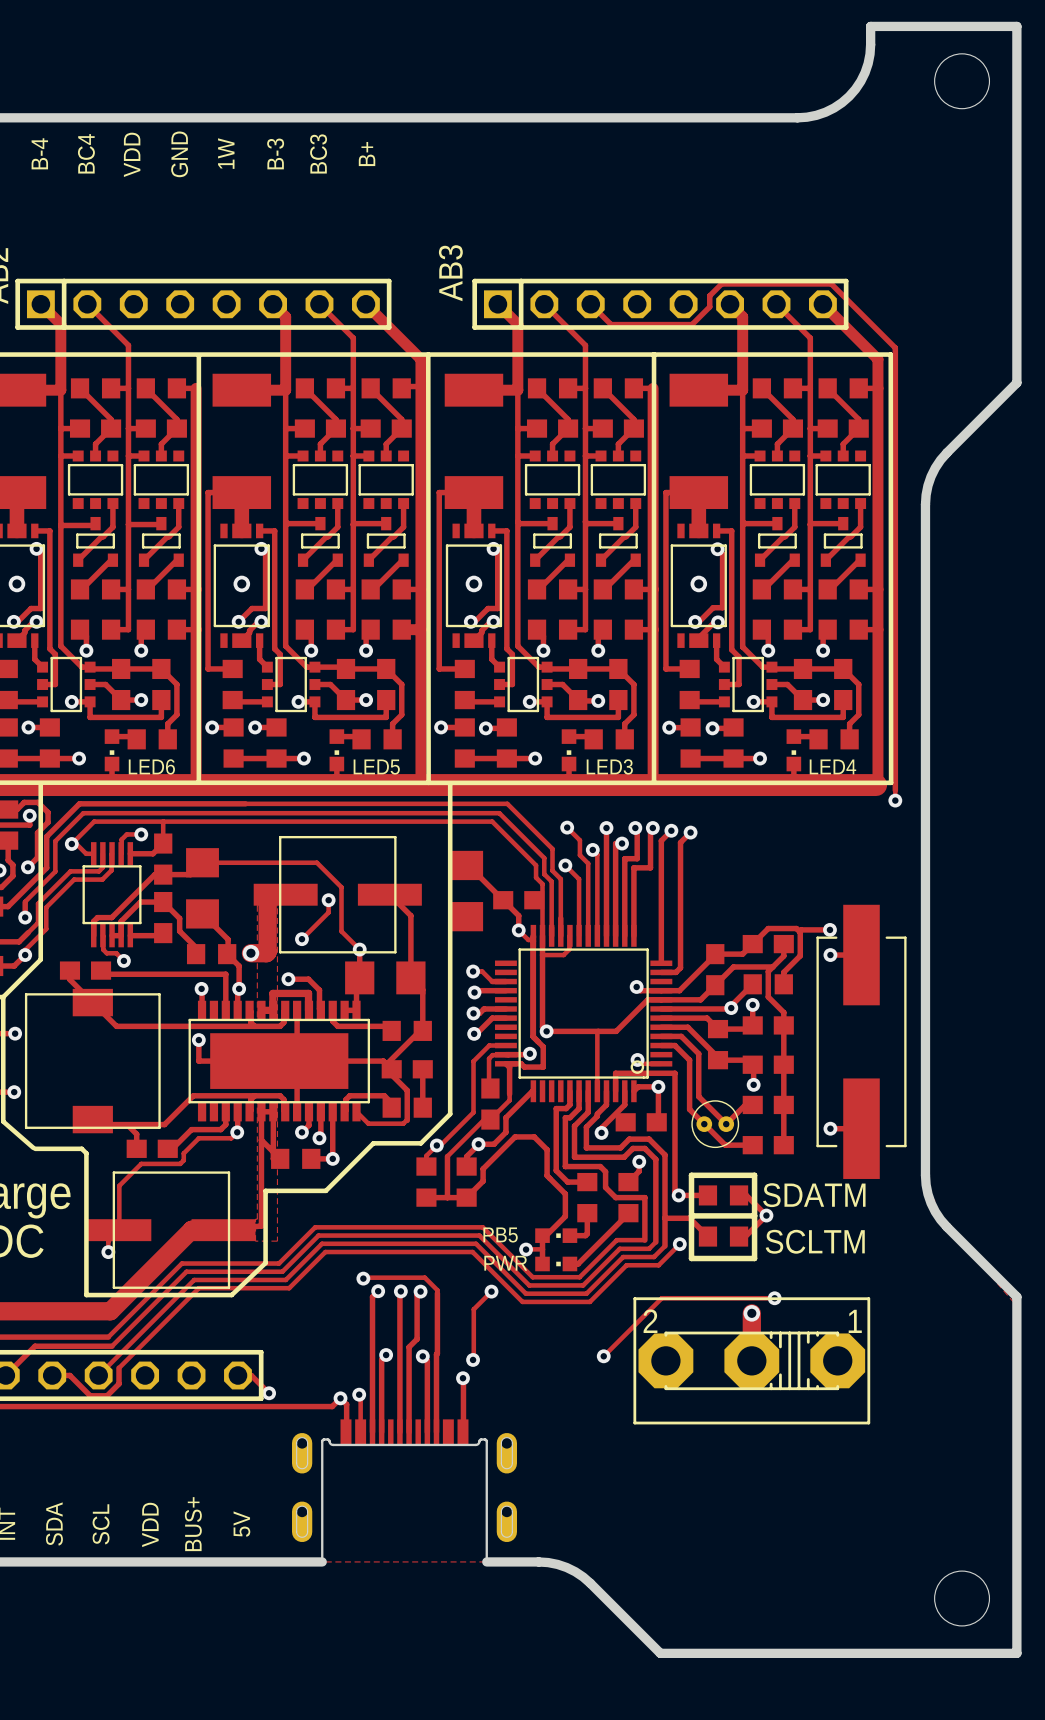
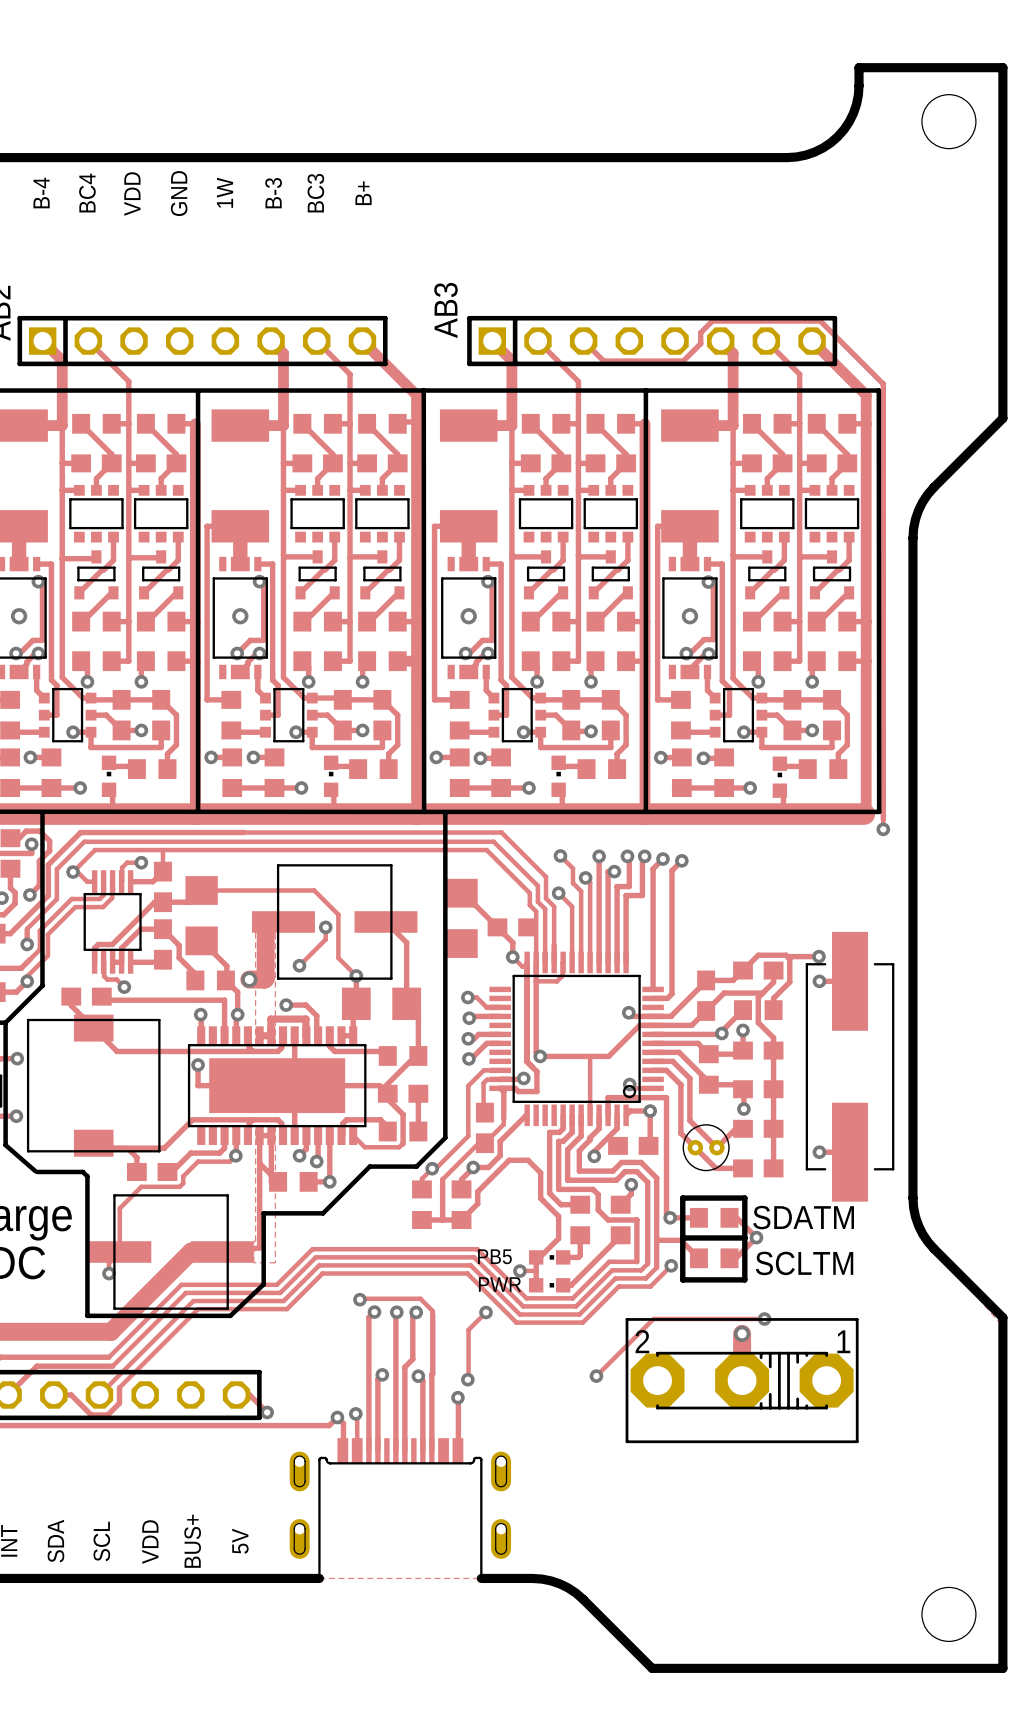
part: none -> (109, 776)
part: none -> (331, 776)
part: none -> (558, 776)
part: none -> (779, 777)
LED6: (112, 750) -> none
LED5: (336, 750) -> none
LED3: (569, 750) -> none
LED4: (793, 750) -> none

